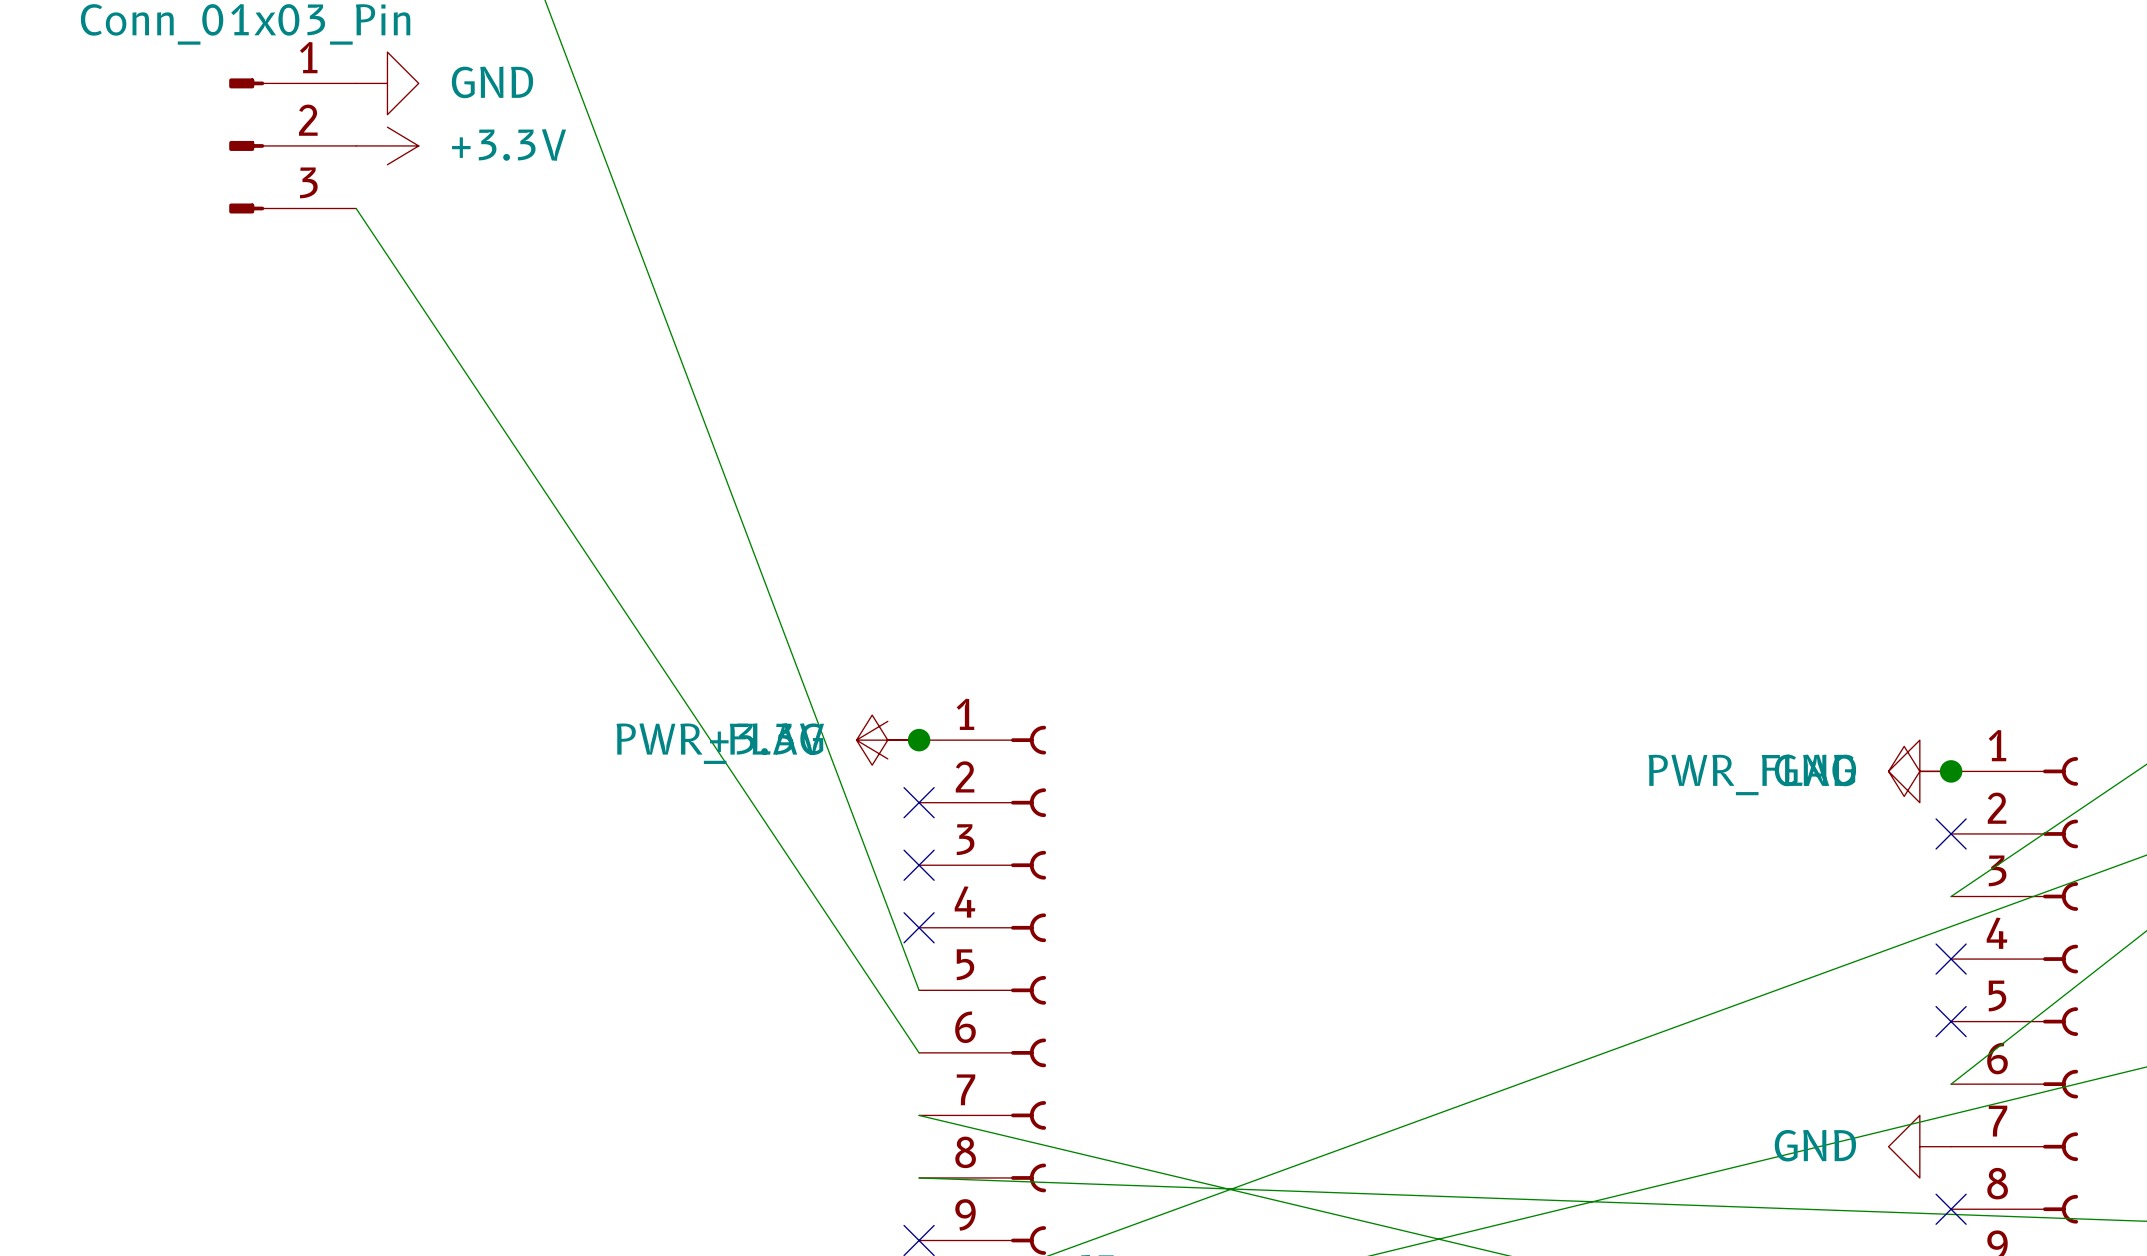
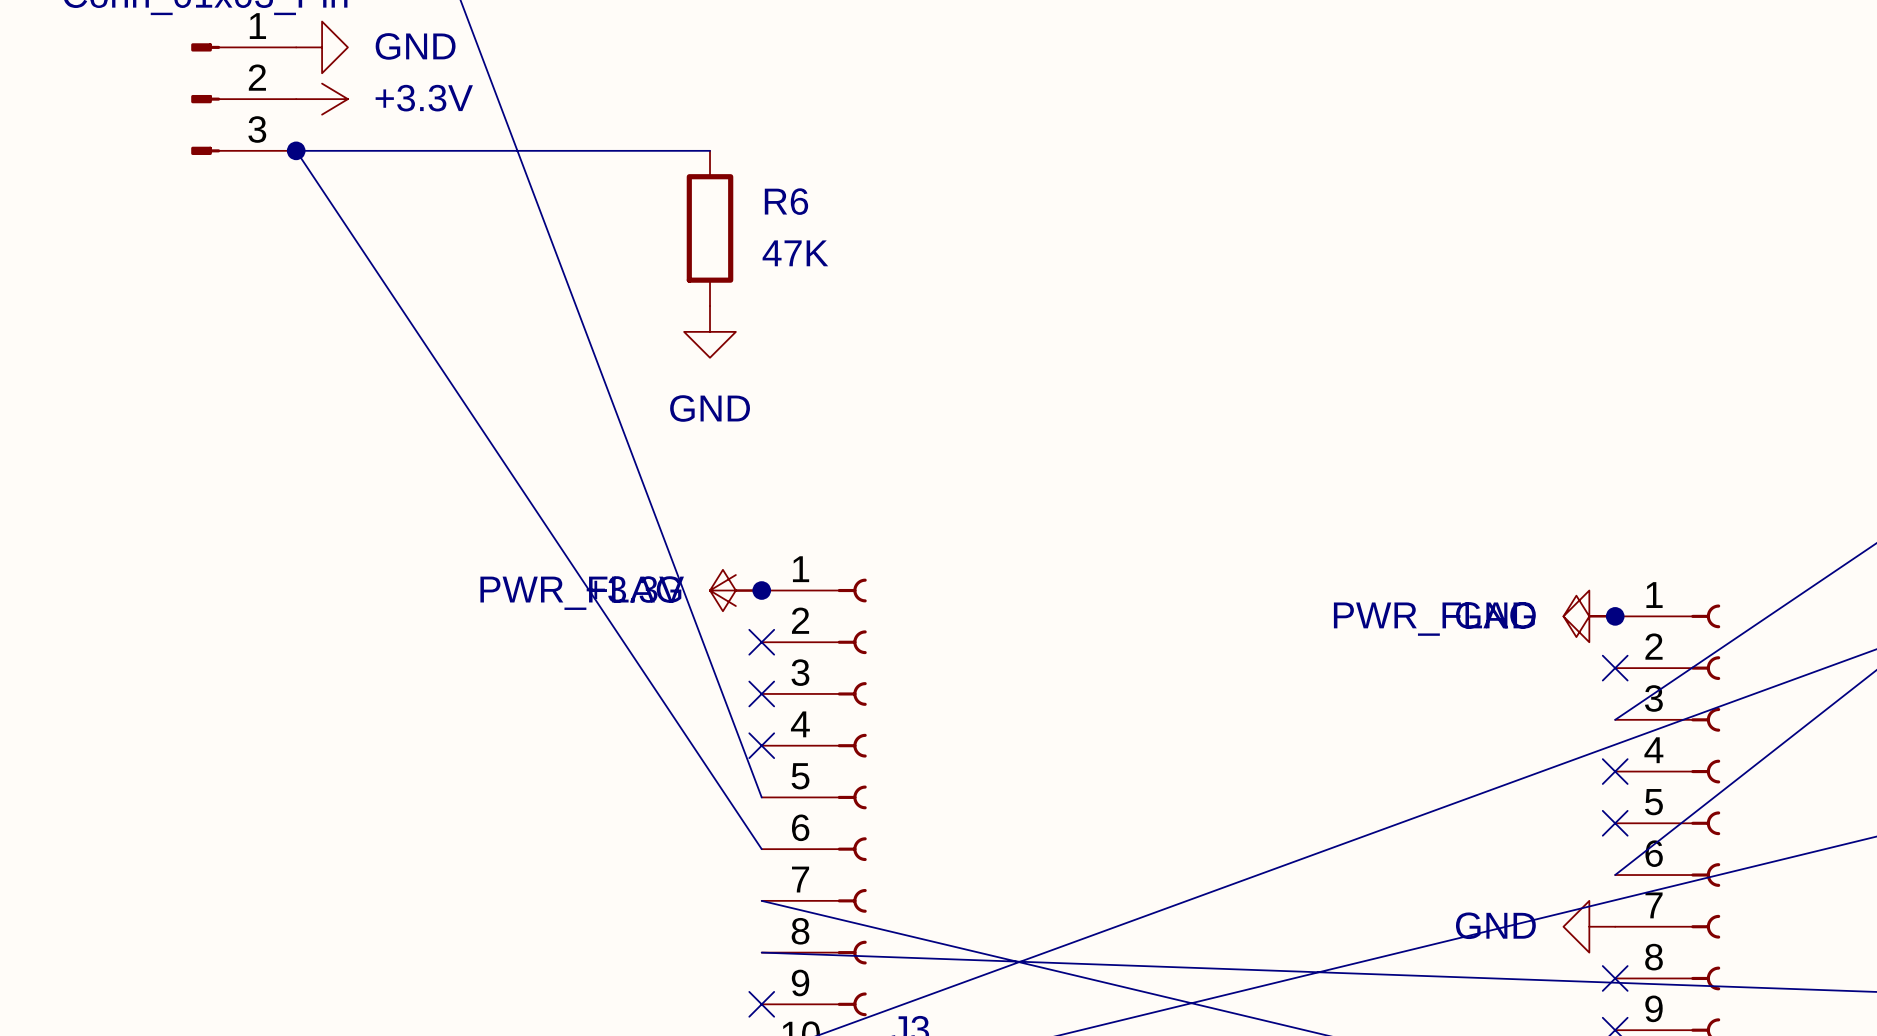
wire: none -> (296, 150) (710, 150)
junction: none -> (296, 150)
R6: none -> 47K (710, 228)
power symbol: none -> GND (710, 331)

